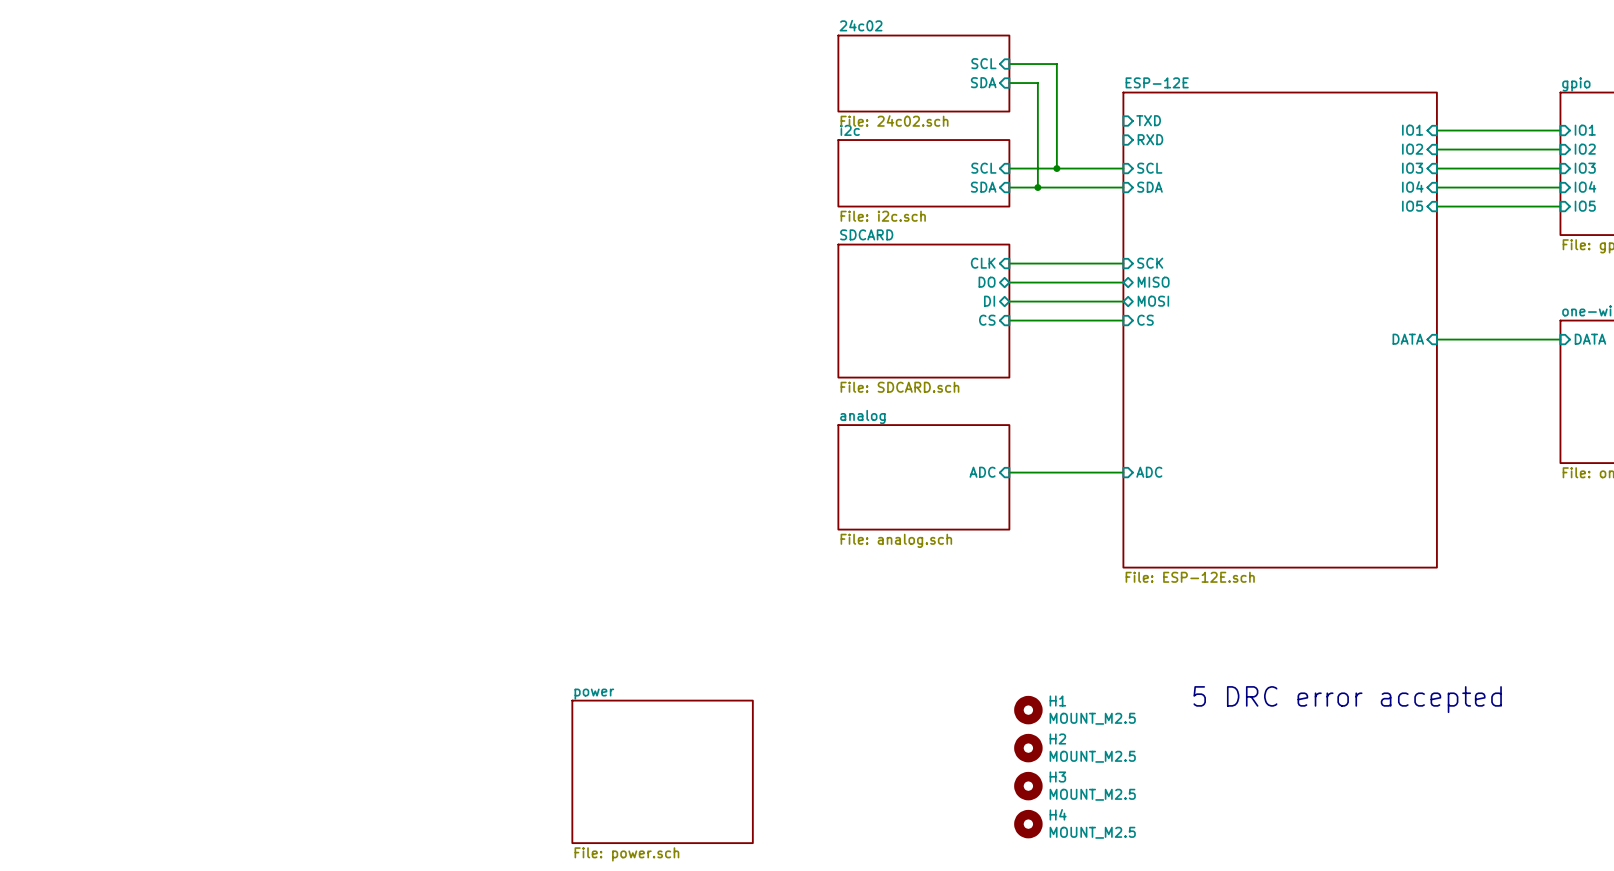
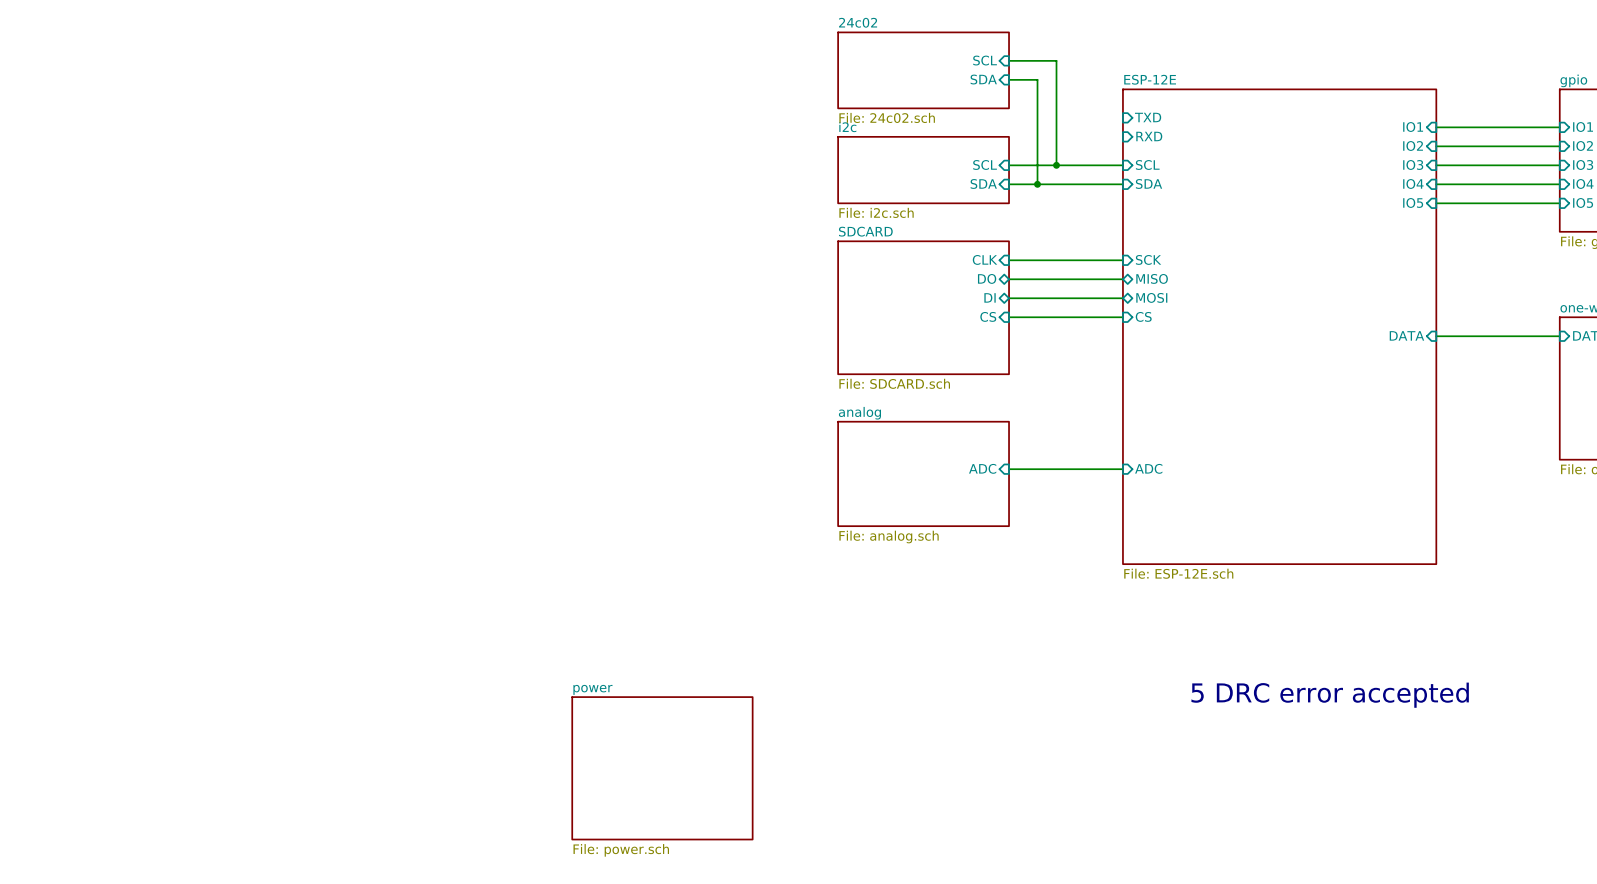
H1: MOUNT_M2.5 (1028, 710) -> none
H2: MOUNT_M2.5 (1028, 748) -> none
H3: MOUNT_M2.5 (1028, 786) -> none
H4: MOUNT_M2.5 (1028, 824) -> none

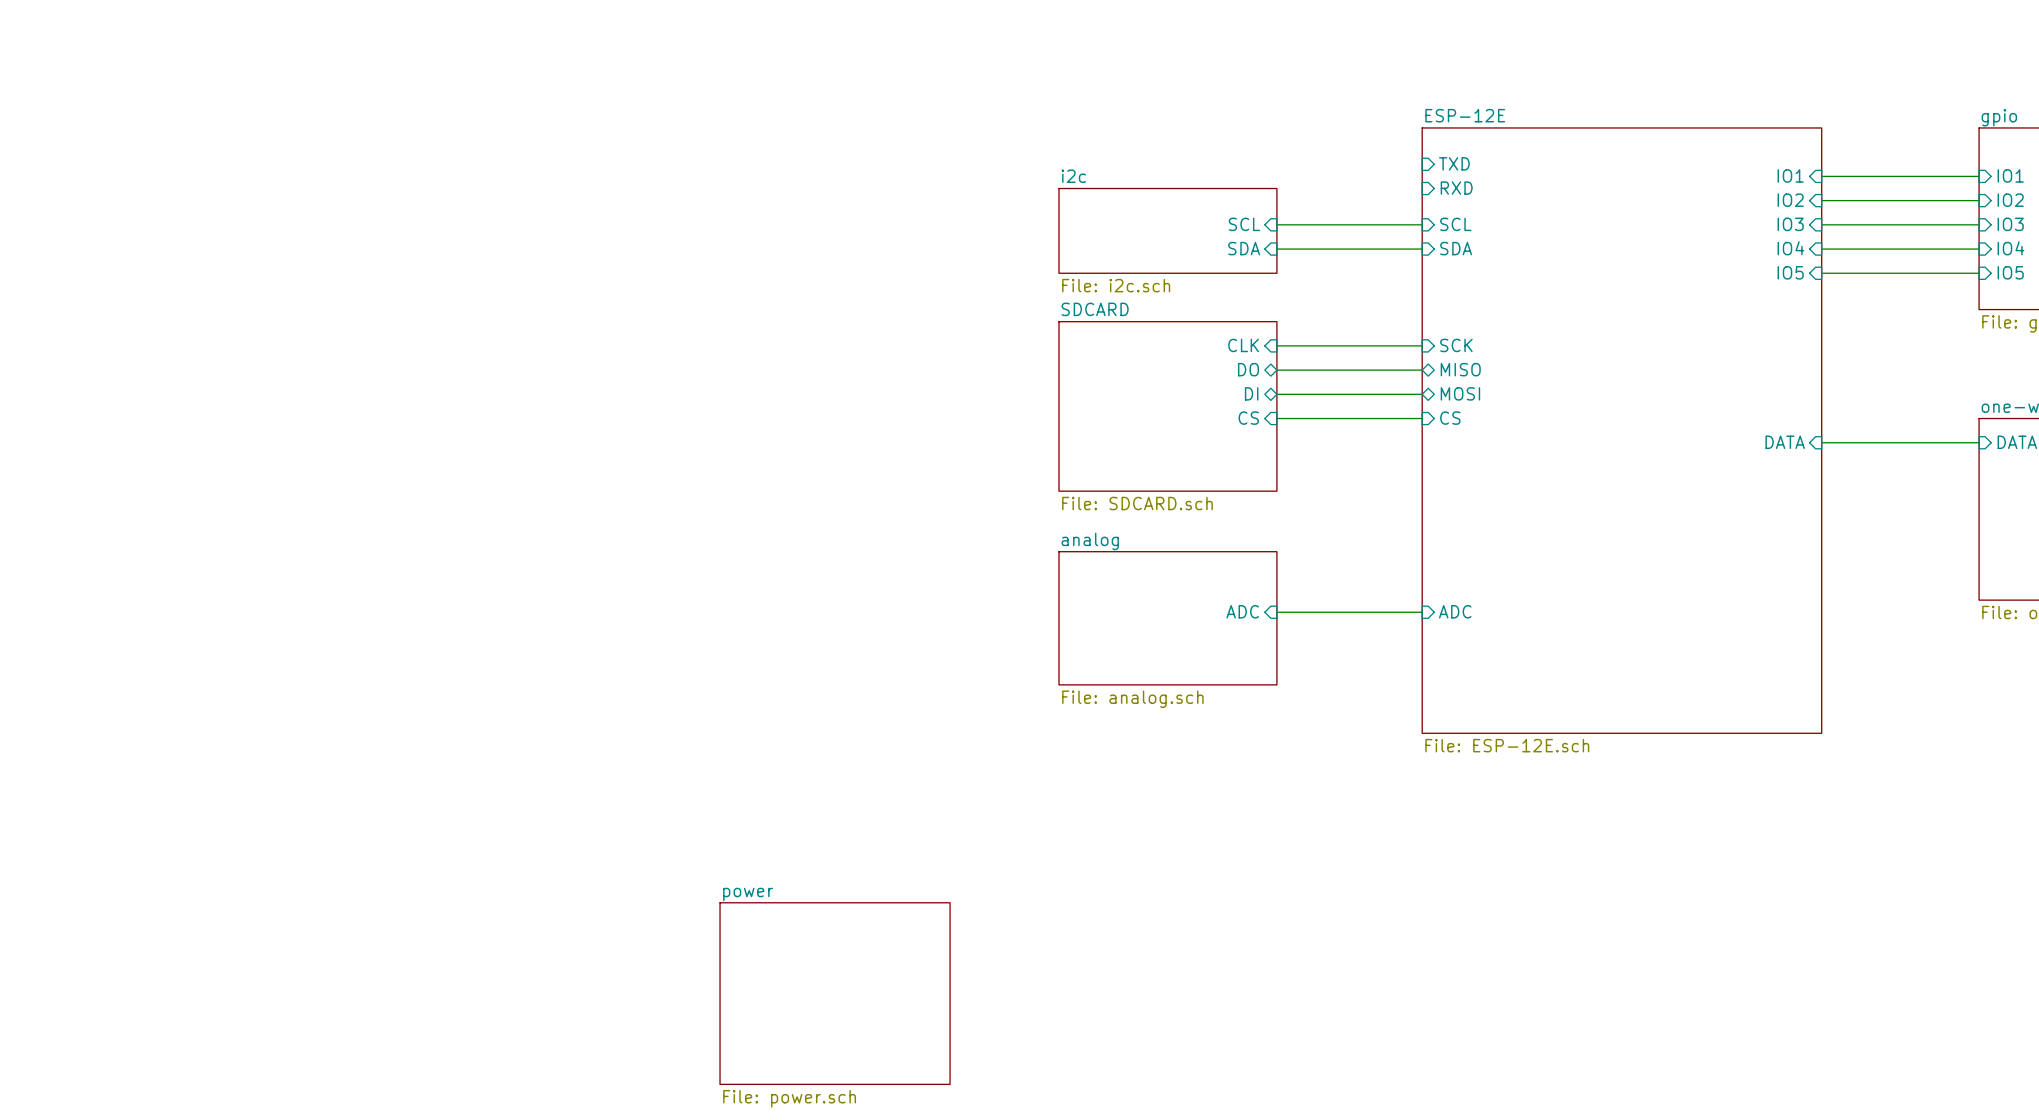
sheet pin: SCL (985, 60) -> none
wire: (1009, 60) (1056, 60) (1056, 165) -> none
sheet 24c02: File: 24c02.sch (923, 70) -> none
sheet pin: SDA (983, 79) -> none
wire: (1009, 79) (1037, 79) (1037, 184) -> none
junction: (1056, 165) -> none
junction: (1037, 184) -> none
text: 5 DRC error accepted (1330, 695) -> none

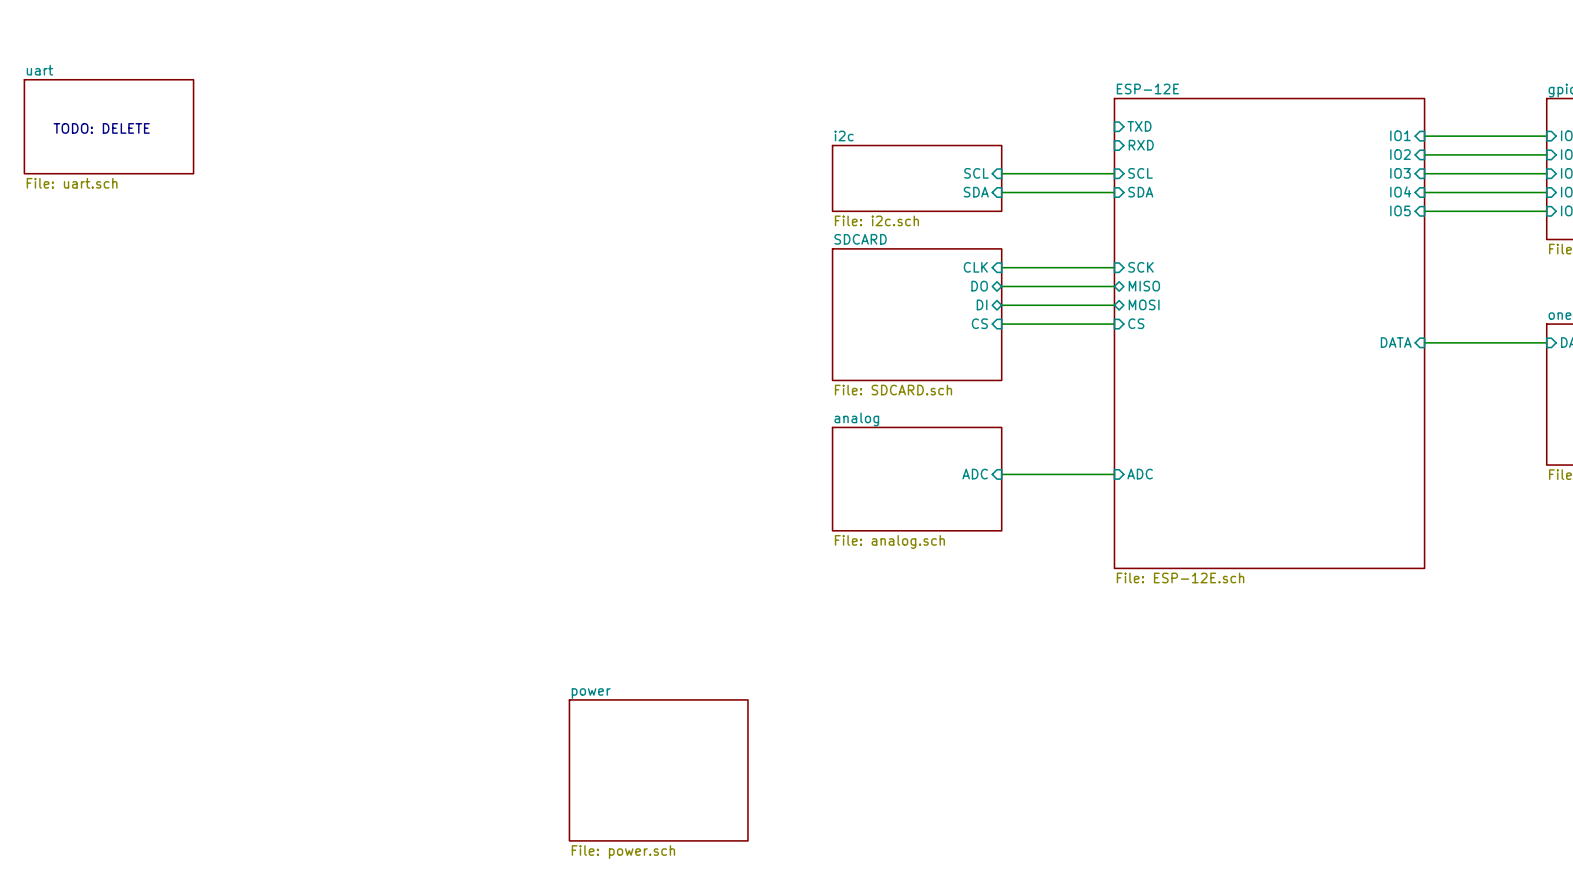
sheet uart: none -> File: uart.sch (108, 126)
text: none -> TODO: DELETE (101, 128)

